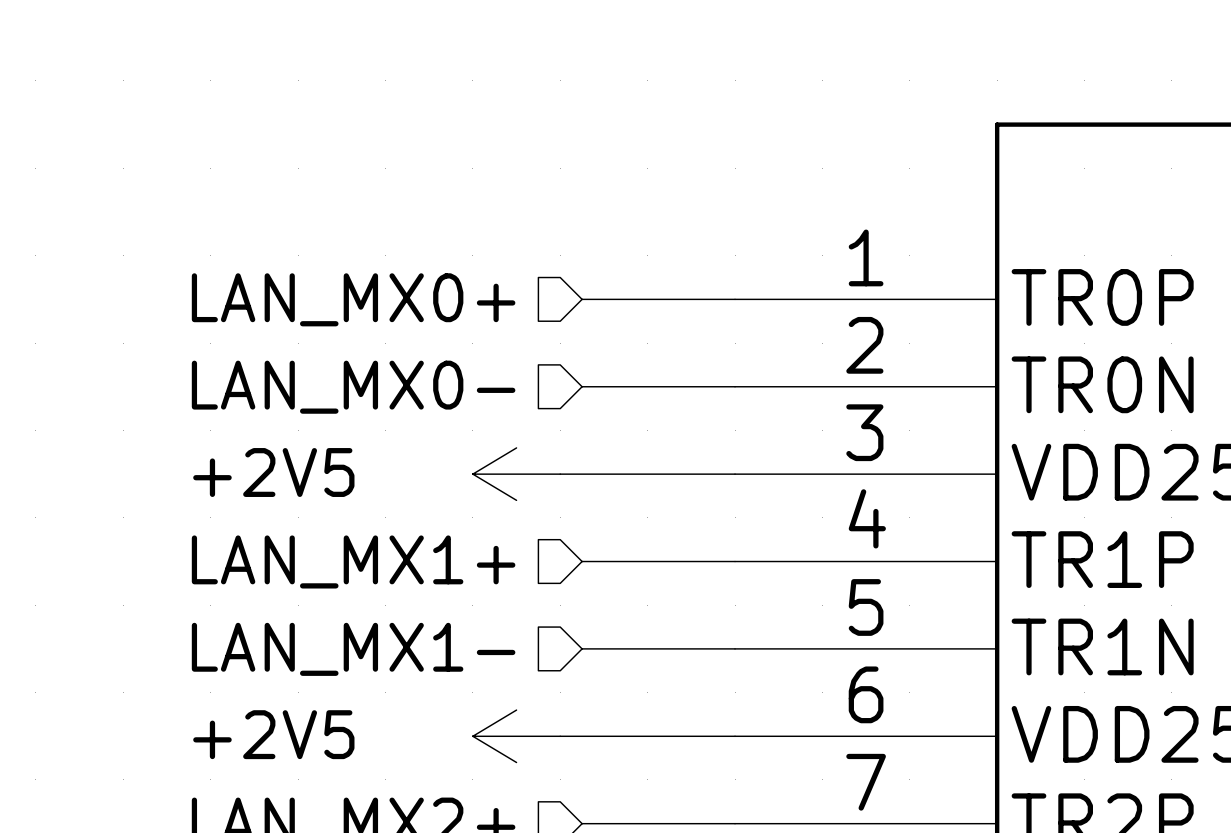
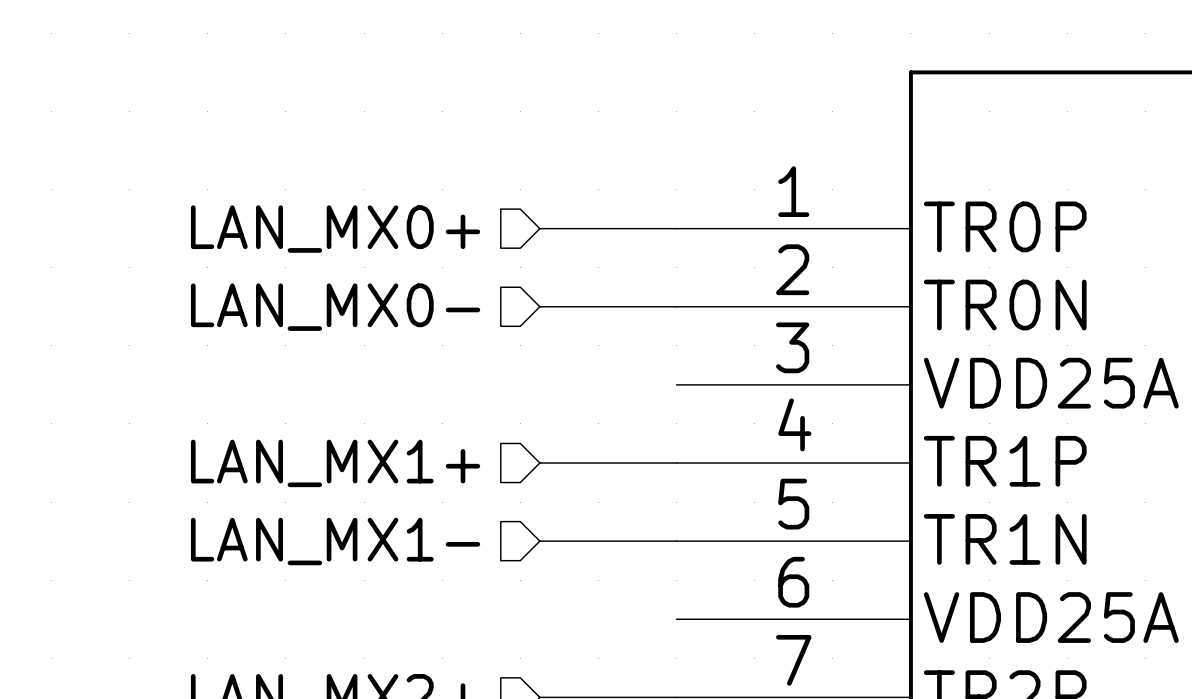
power symbol: +2V5 (516, 474) -> none
wire: (560, 474) (735, 474) -> none
power symbol: +2V5 (516, 736) -> none
wire: (560, 736) (735, 736) -> none

